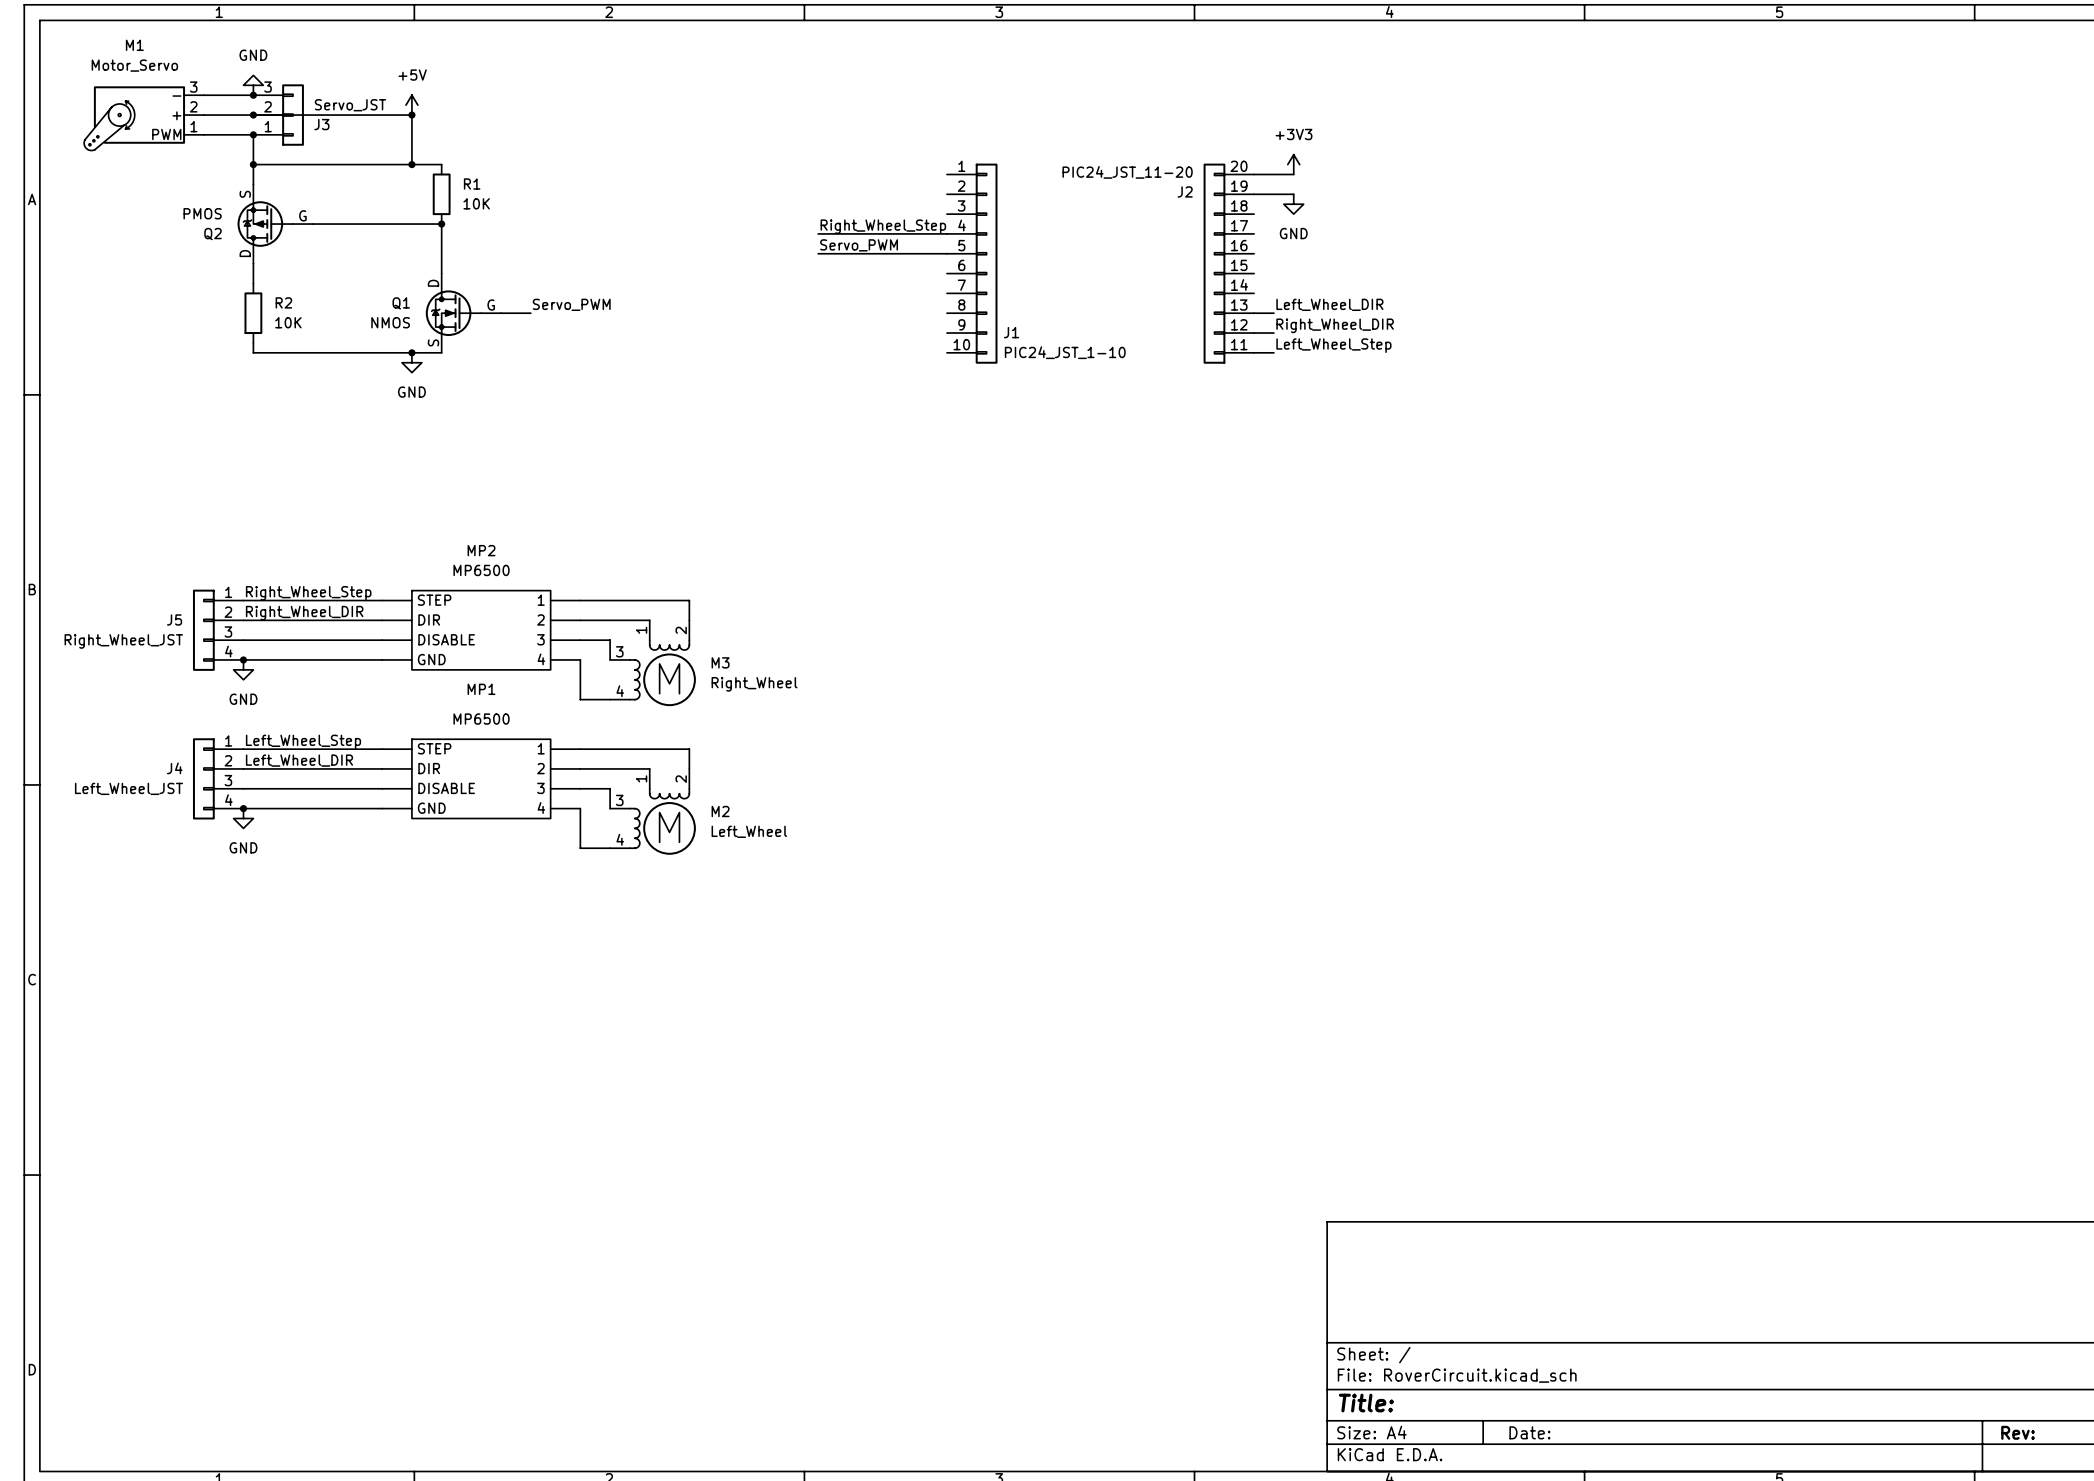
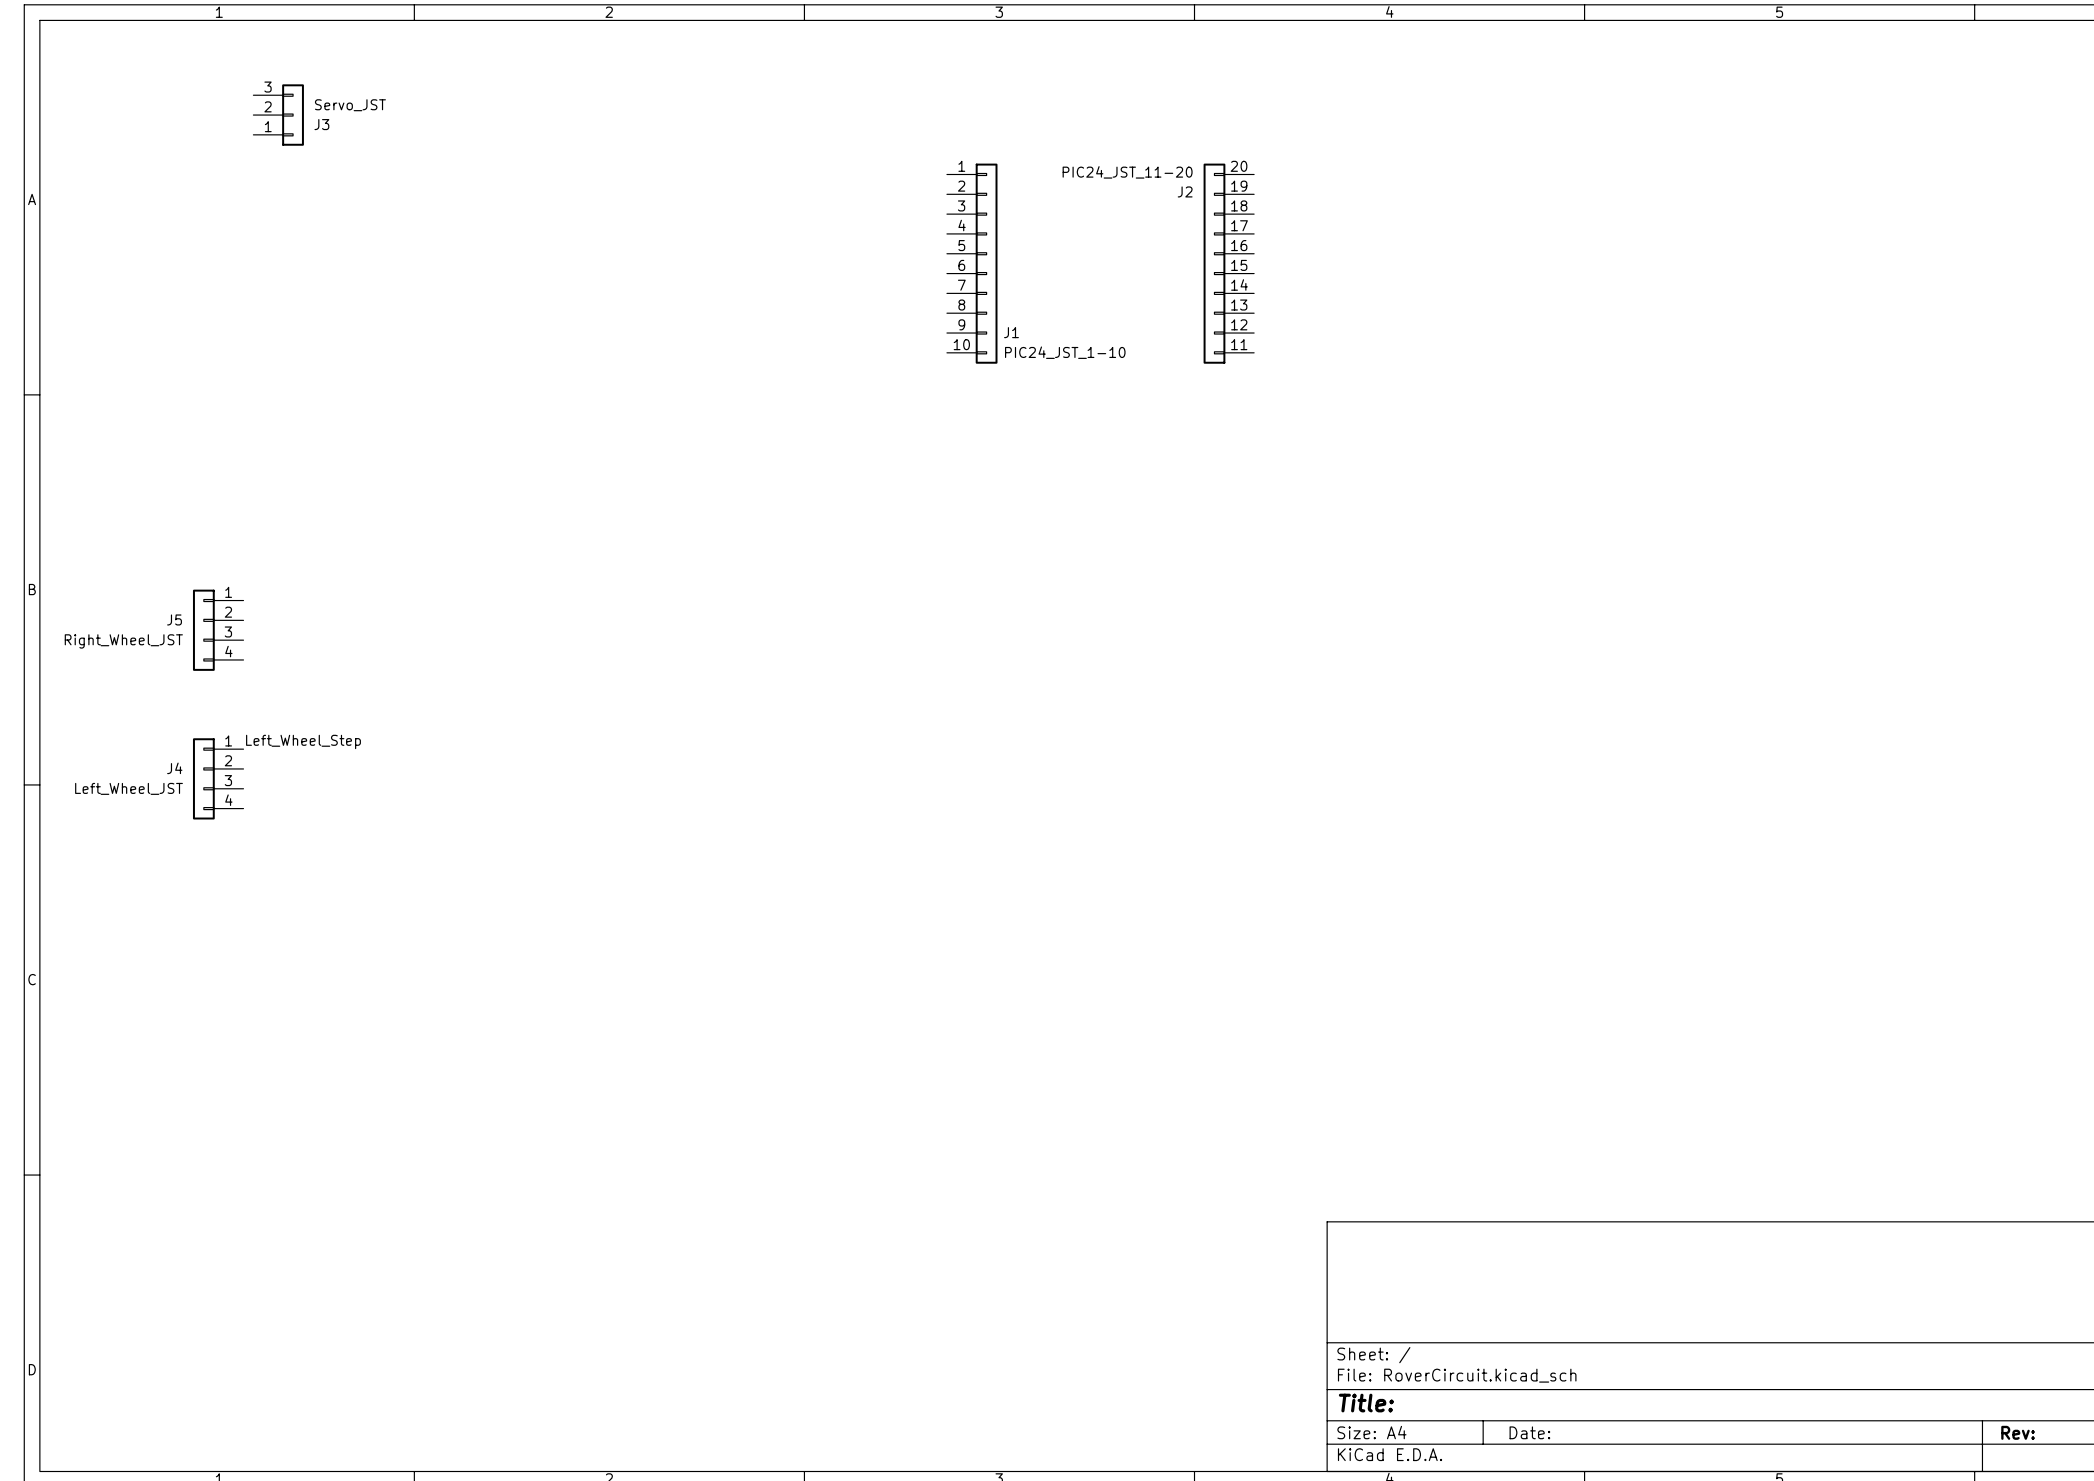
power symbol: GND (253, 85) -> none
wire: (203, 95) (253, 95) -> none
junction: (253, 95) -> none
power symbol: +5V (411, 105) -> none
wire: (203, 115) (411, 115) (411, 164) -> none
junction: (253, 115) -> none
junction: (411, 115) -> none
M1: Motor_Servo (144, 118) -> none
wire: (203, 134) (253, 134) (253, 184) -> none
junction: (253, 134) -> none
wire: (253, 164) (441, 164) -> none
junction: (253, 164) -> none
junction: (411, 164) -> none
power symbol: +3V3 (1293, 164) -> none
wire: (1254, 174) (1293, 174) -> none
R1: 10K (441, 194) -> none
wire: (1254, 194) (1293, 194) -> none
power symbol: GND (1293, 204) -> none
Q2: PMOS (275, 224) -> none
wire: (312, 224) (441, 224) (441, 273) -> none
junction: (441, 224) -> none
label: Right_Wheel_Step (883, 226) -> none
wire: (818, 233) (946, 233) -> none
label: Servo_PWM (859, 245) -> none
wire: (818, 253) (946, 253) -> none
wire: (253, 263) (253, 283) -> none
label: Servo_PWM (571, 304) -> none
label: Left_Wheel_DIR (1329, 304) -> none
R2: 10K (253, 313) -> none
Q1: NMOS (463, 313) -> none
wire: (501, 313) (530, 313) -> none
wire: (1254, 313) (1273, 313) -> none
label: Right_Wheel_DIR (1335, 325) -> none
wire: (1254, 333) (1273, 333) -> none
wire: (253, 342) (253, 352) (441, 352) -> none
label: Left_Wheel_Step (1333, 345) -> none
junction: (411, 352) -> none
wire: (1254, 352) (1273, 352) -> none
power symbol: GND (411, 362) -> none
label: Right_Wheel_Step (308, 593) -> none
wire: (243, 600) (382, 600) -> none
wire: (580, 600) (689, 600) (689, 620) -> none
label: Right_Wheel_DIR (304, 613) -> none
wire: (243, 620) (382, 620) -> none
wire: (580, 620) (649, 620) -> none
MP2: MP6500 (481, 630) -> none
wire: (243, 640) (382, 640) -> none
wire: (580, 640) (610, 640) (610, 659) -> none
wire: (243, 659) (382, 659) -> none
junction: (243, 659) -> none
wire: (580, 659) (580, 699) (610, 699) -> none
M3: Right_Wheel (652, 663) -> none
power symbol: GND (243, 669) -> none
wire: (243, 749) (382, 749) -> none
wire: (580, 749) (689, 749) (689, 768) -> none
label: Left_Wheel_DIR (299, 760) -> none
wire: (243, 768) (382, 768) -> none
wire: (580, 768) (649, 768) -> none
MP1: MP6500 (481, 778) -> none
wire: (243, 788) (382, 788) -> none
wire: (580, 788) (610, 788) (610, 808) -> none
wire: (243, 808) (382, 808) -> none
junction: (243, 808) -> none
wire: (580, 808) (580, 848) (610, 848) -> none
M2: Left_Wheel (652, 811) -> none
power symbol: GND (243, 818) -> none

